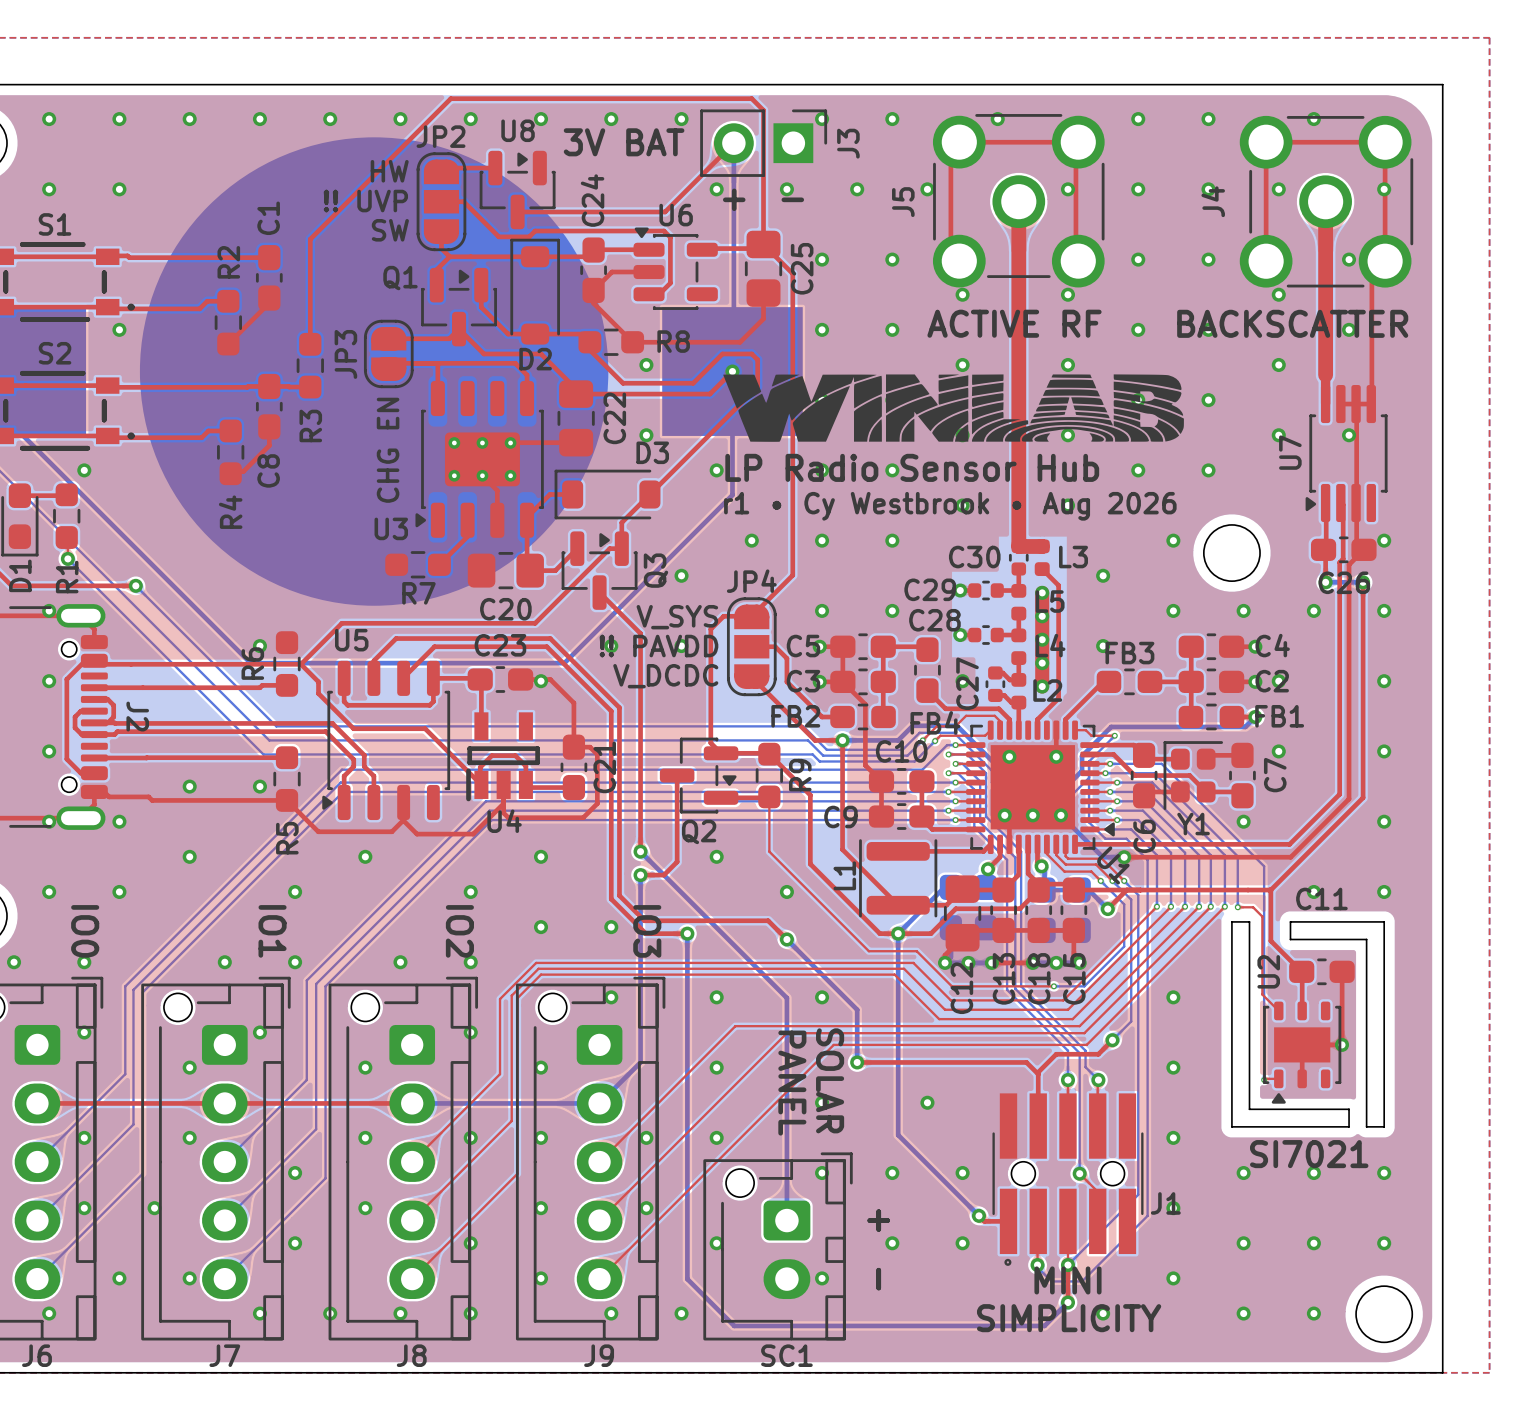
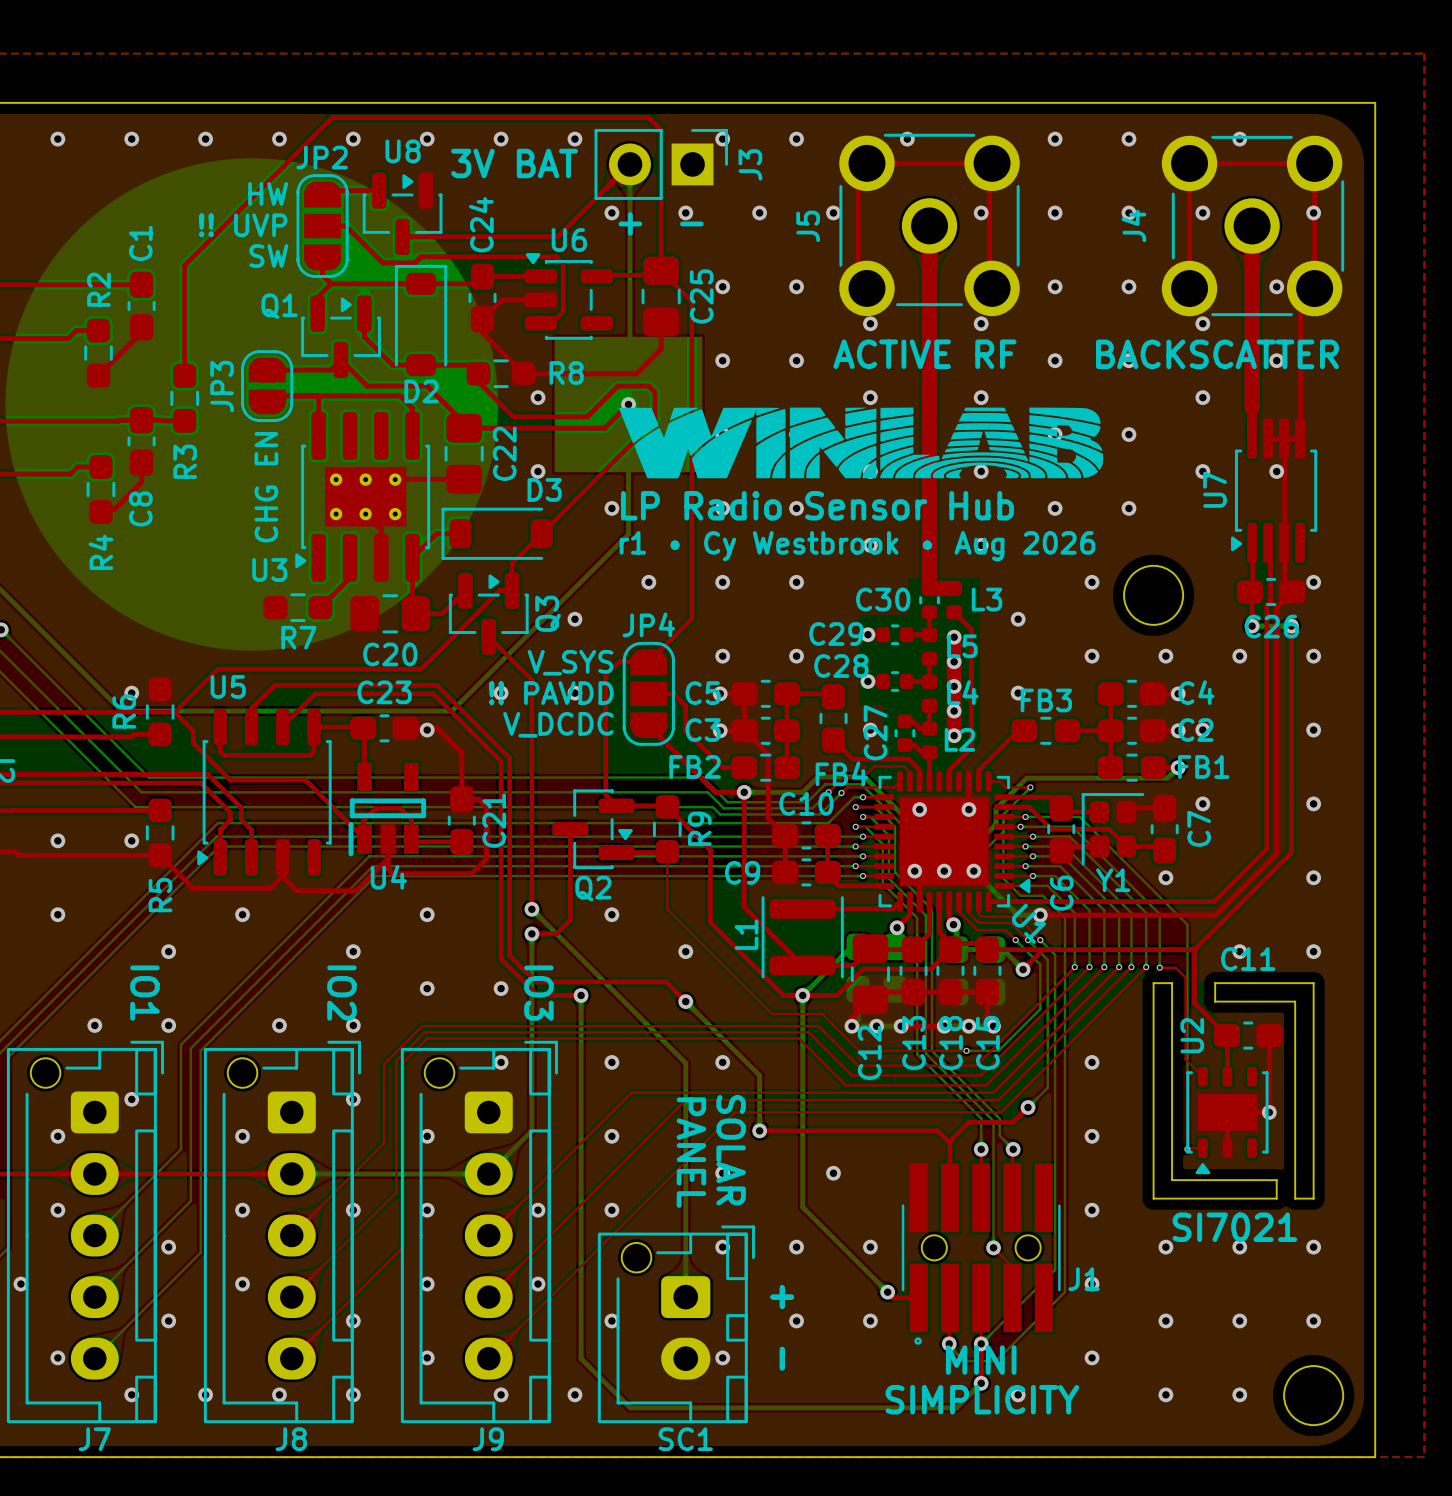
U3 footprint: [415, 380, 544, 538] -> [295, 411, 431, 582]

